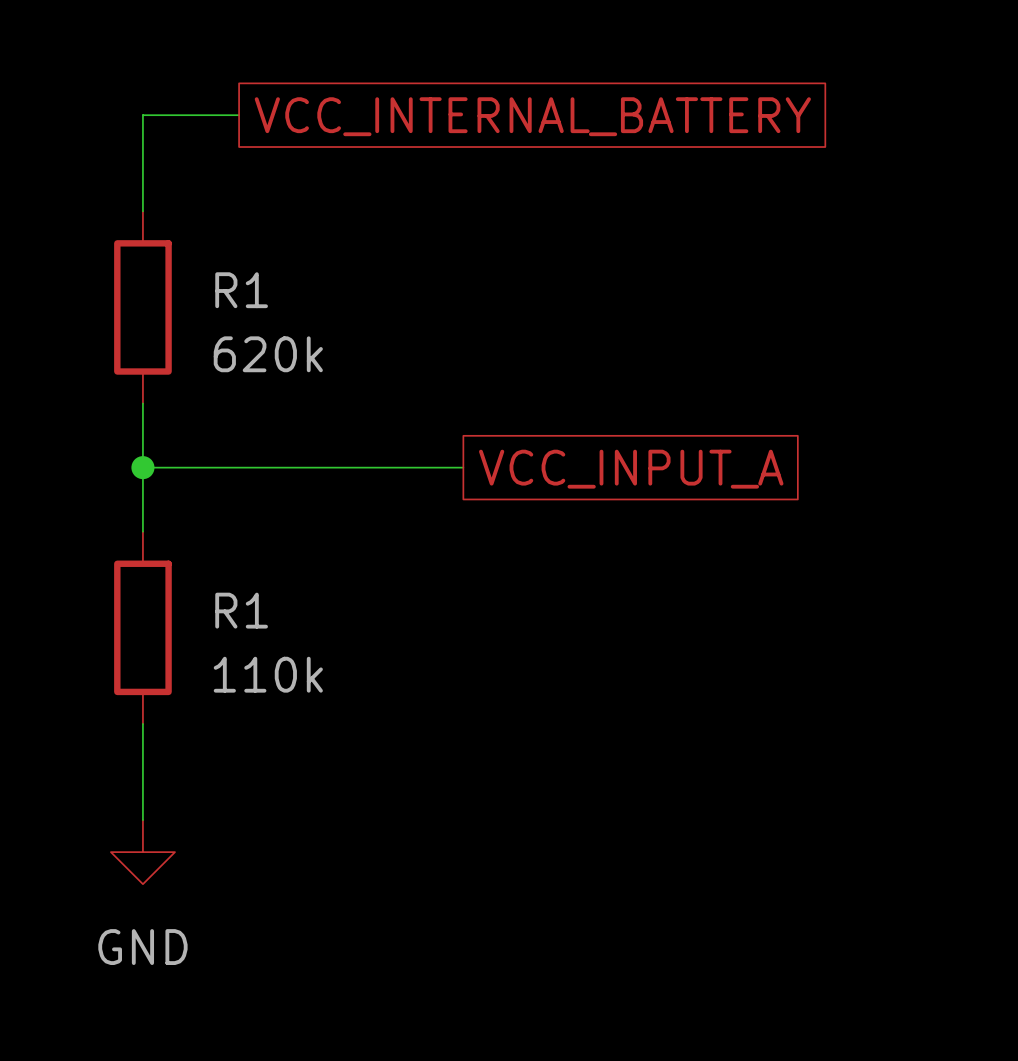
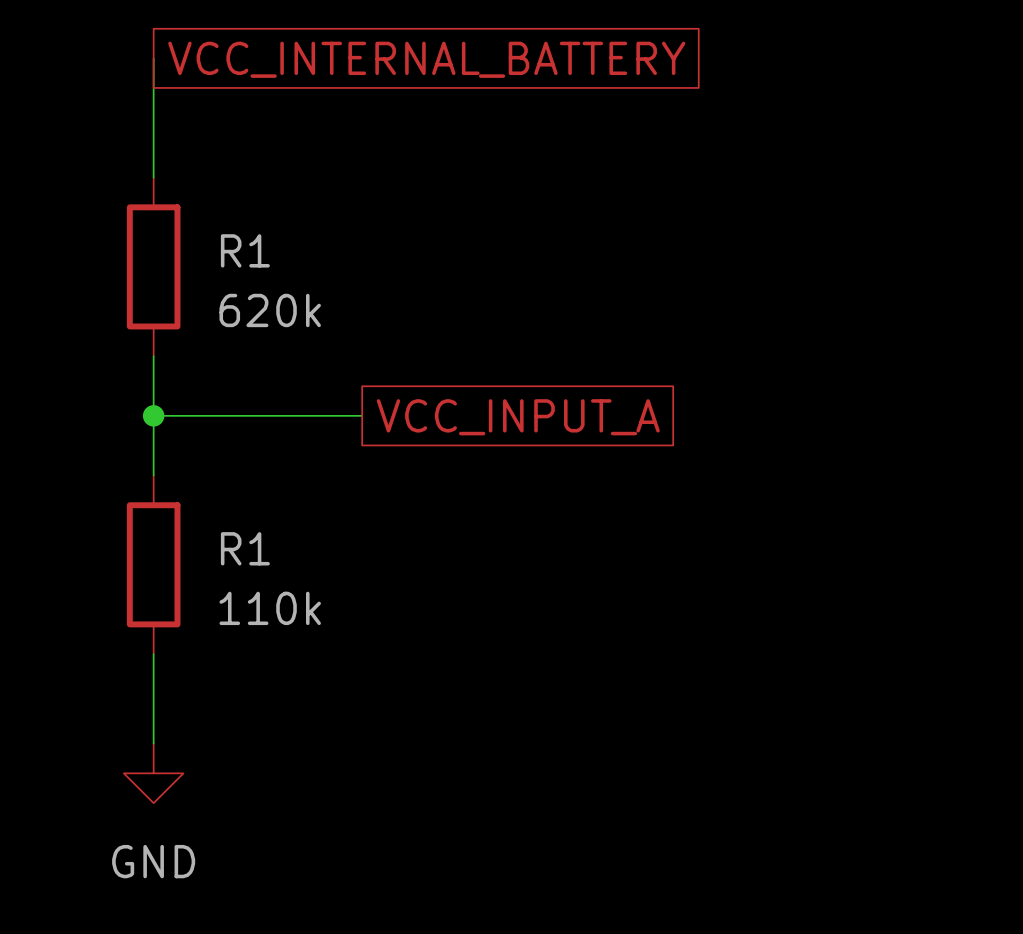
global label position: VCC_INTERNAL_BATTERY (532, 116) -> VCC_INTERNAL_BATTERY (426, 59)
wire: (367, 467) (463, 467) -> none
global label position: VCC_INPUT_A (631, 469) -> VCC_INPUT_A (518, 417)

